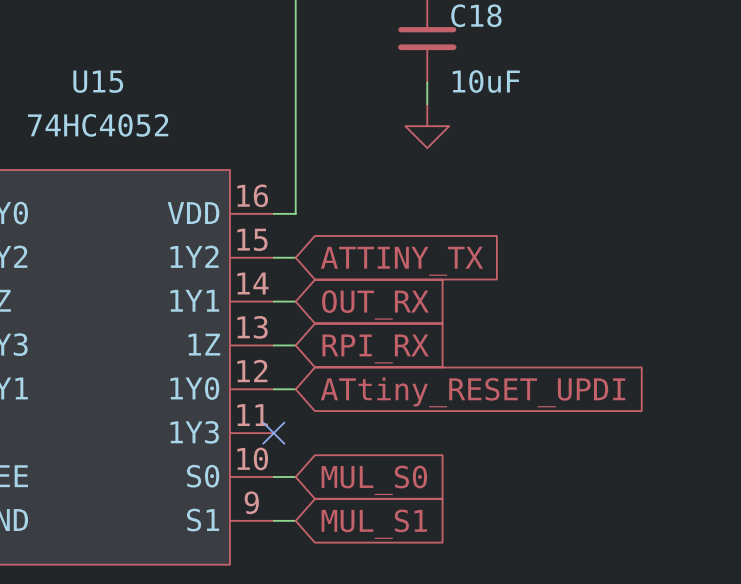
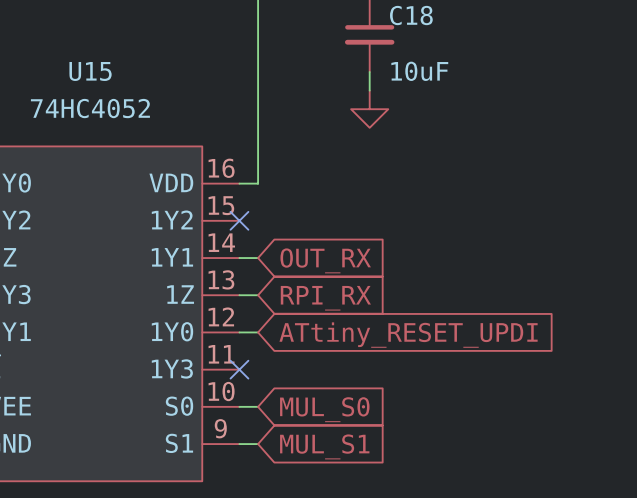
wire: (273, 257) (295, 257) -> none
no-connect mark: none -> (239, 220)
global label: ATTINY_TX (401, 261) -> none

